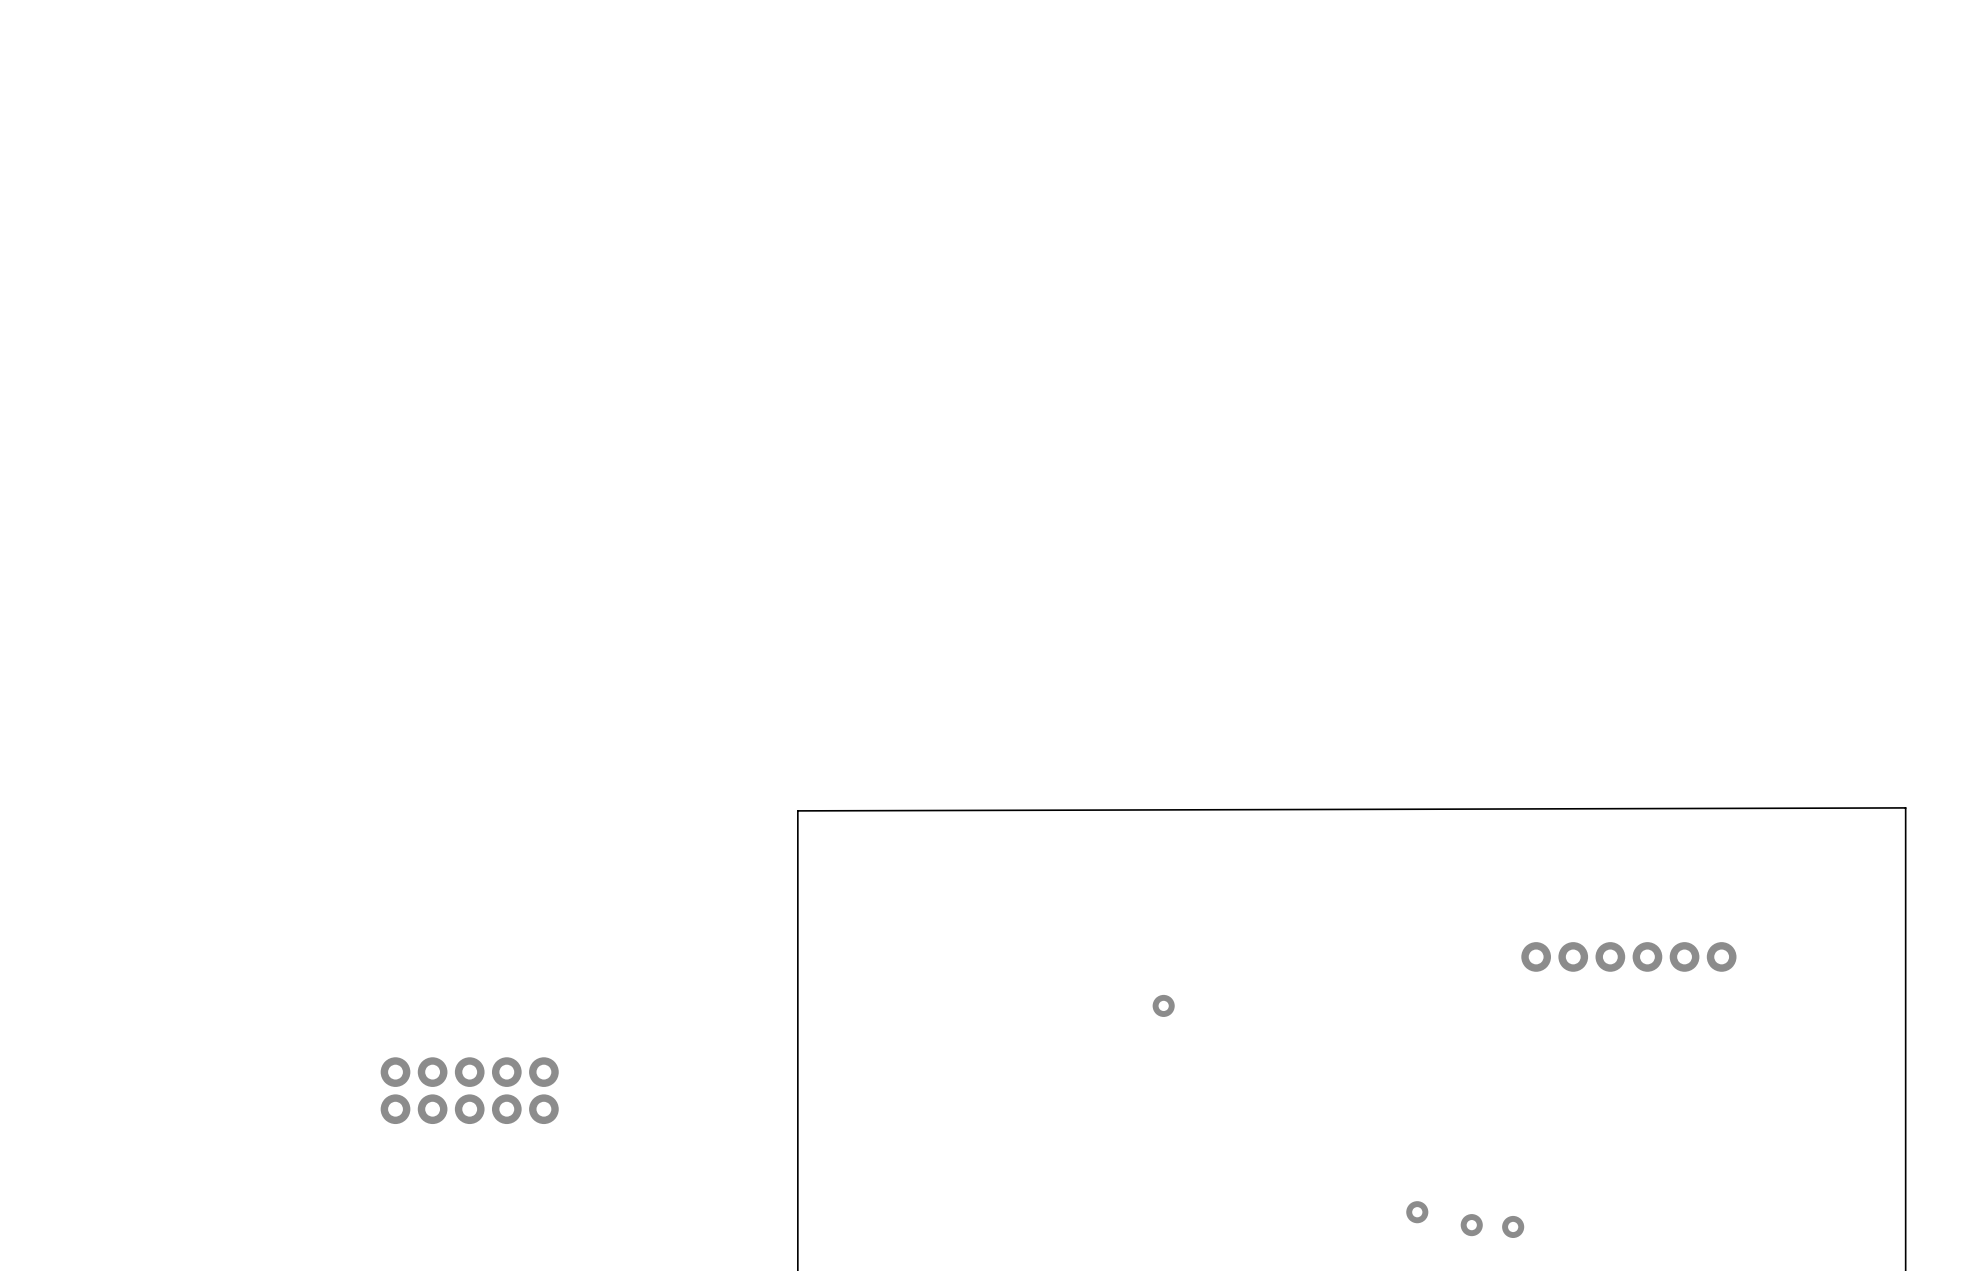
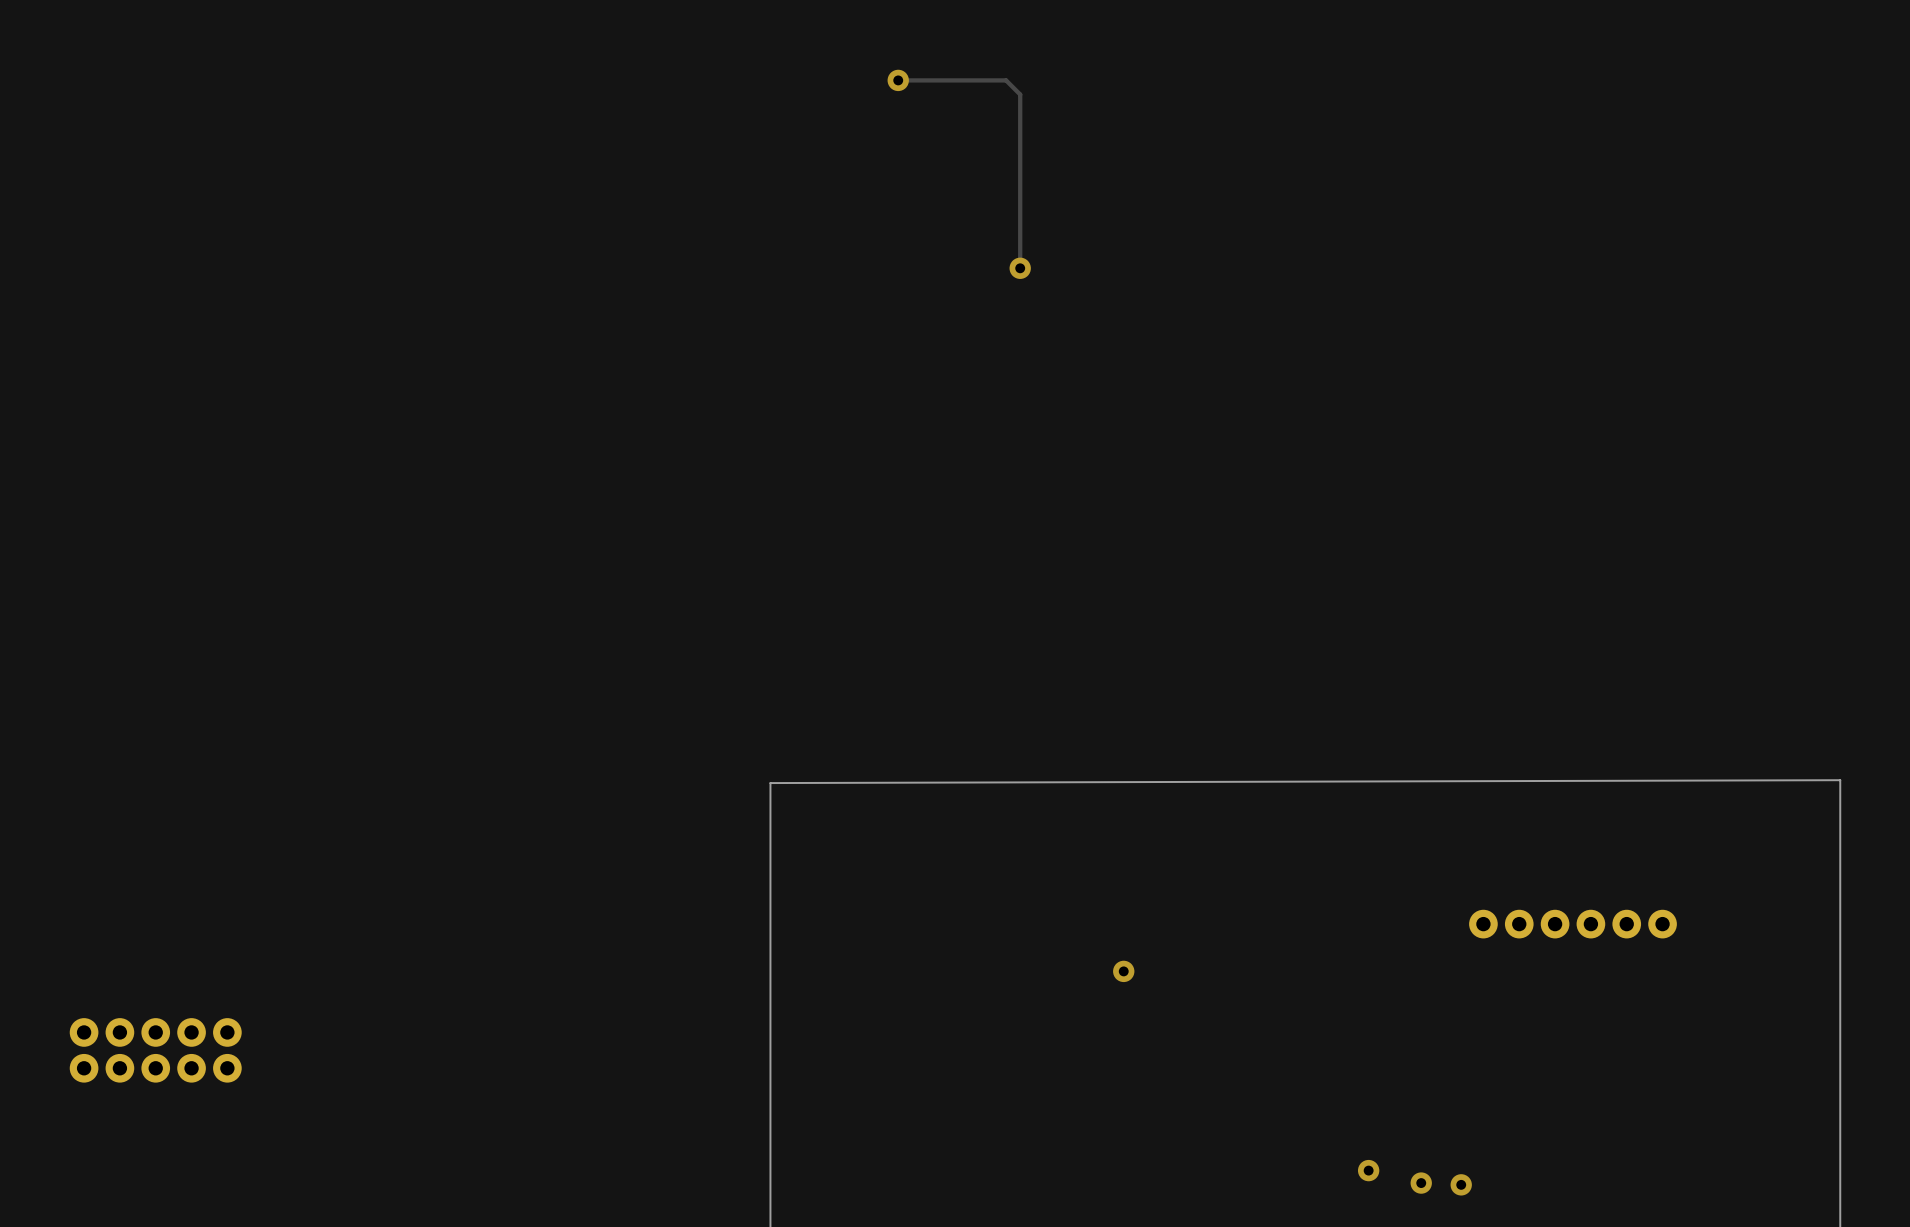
track: none -> (898, 80) (1006, 80) (1020, 94) (1020, 268)
via: none -> (898, 80)
via: none -> (1020, 268)
part position: (469, 1090) -> (155, 1050)

